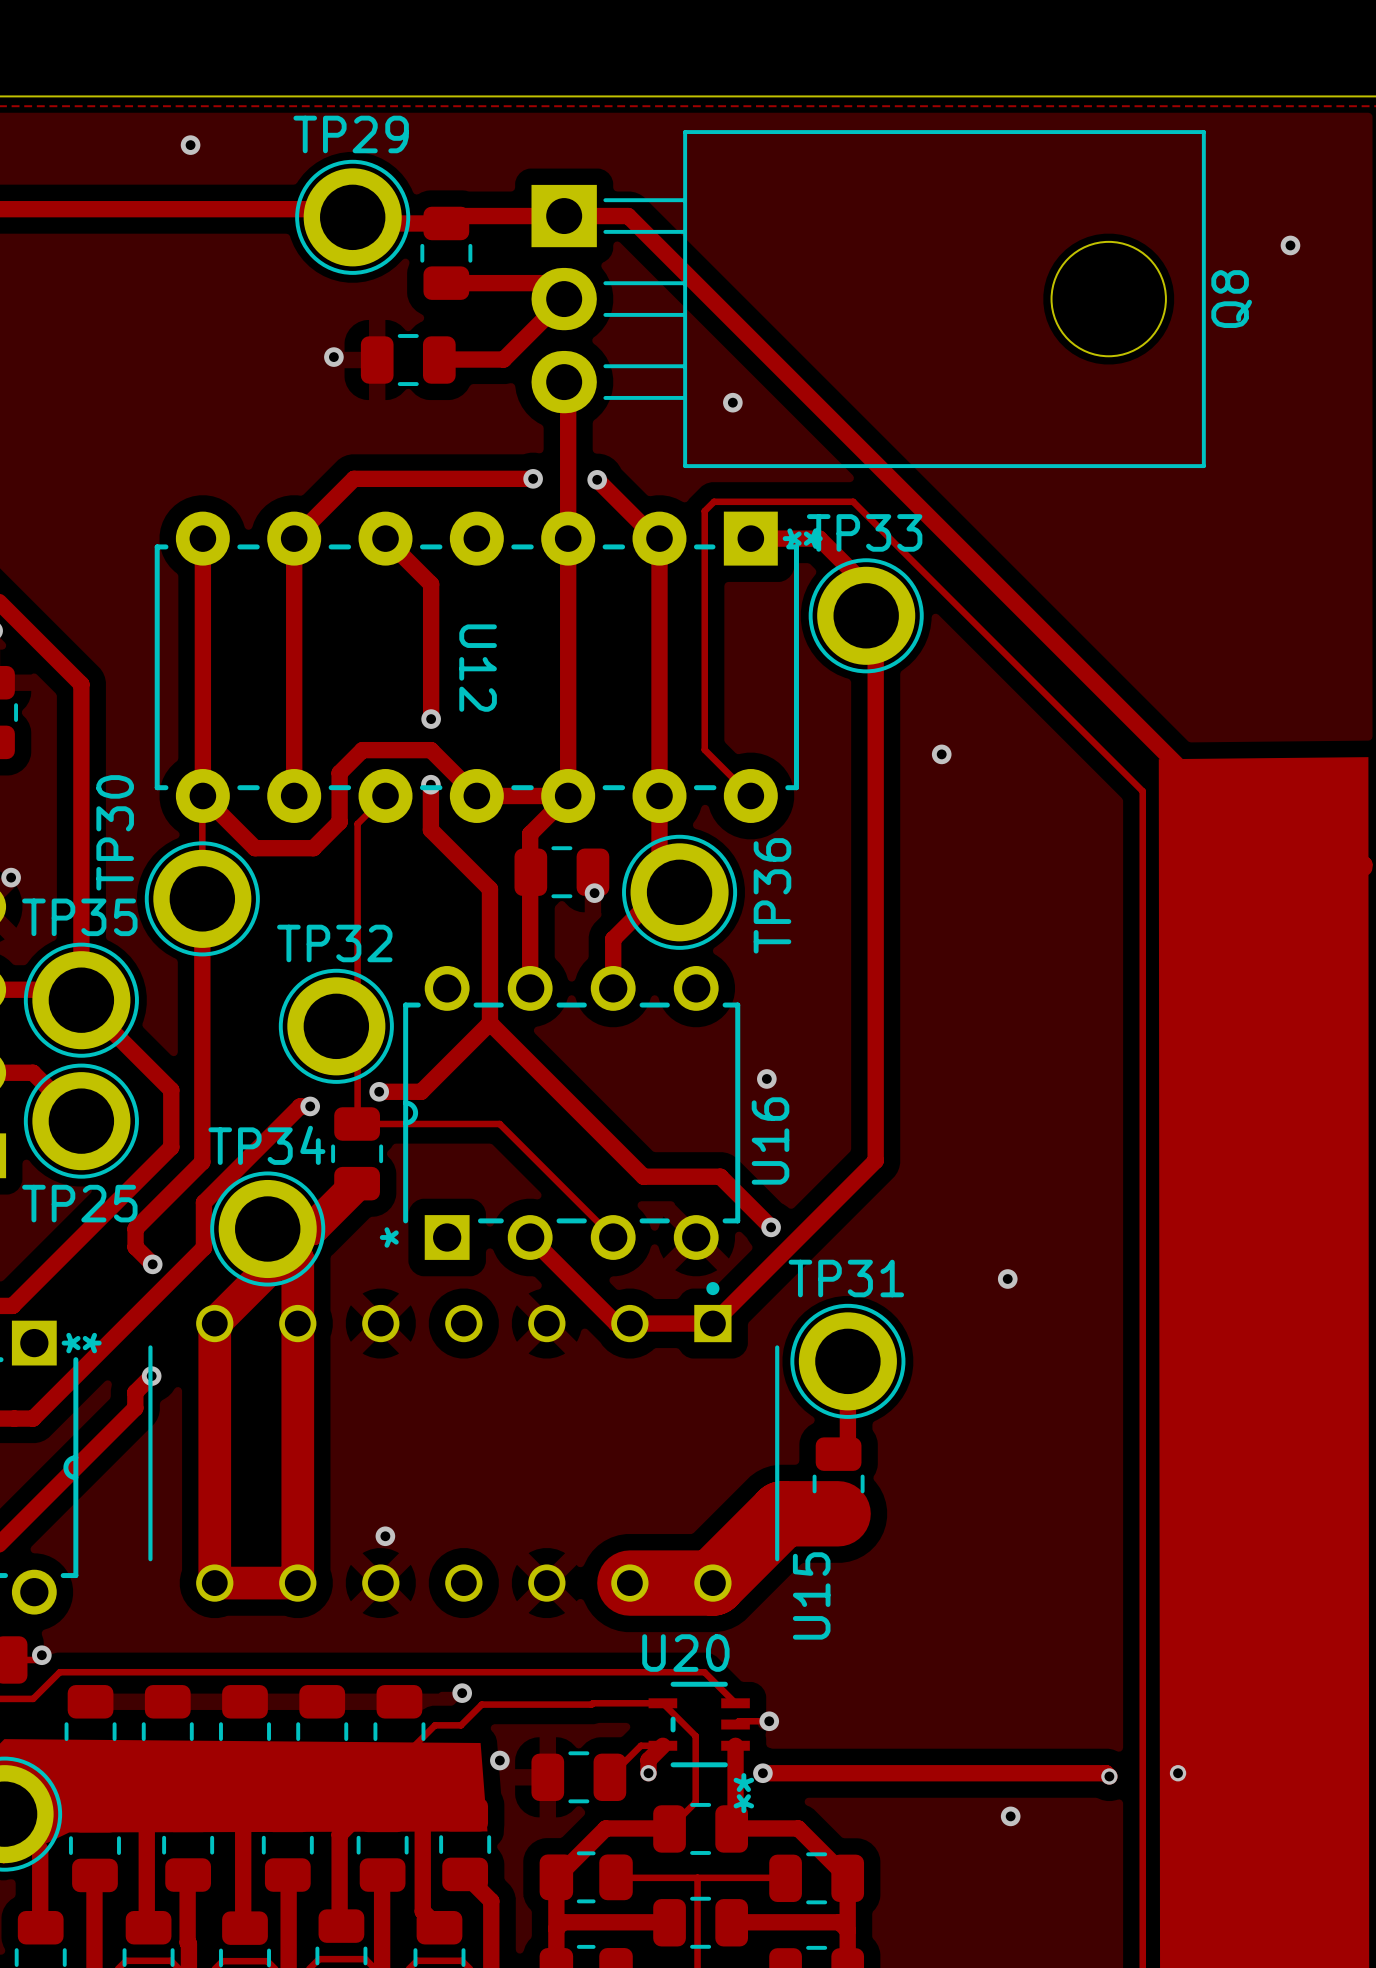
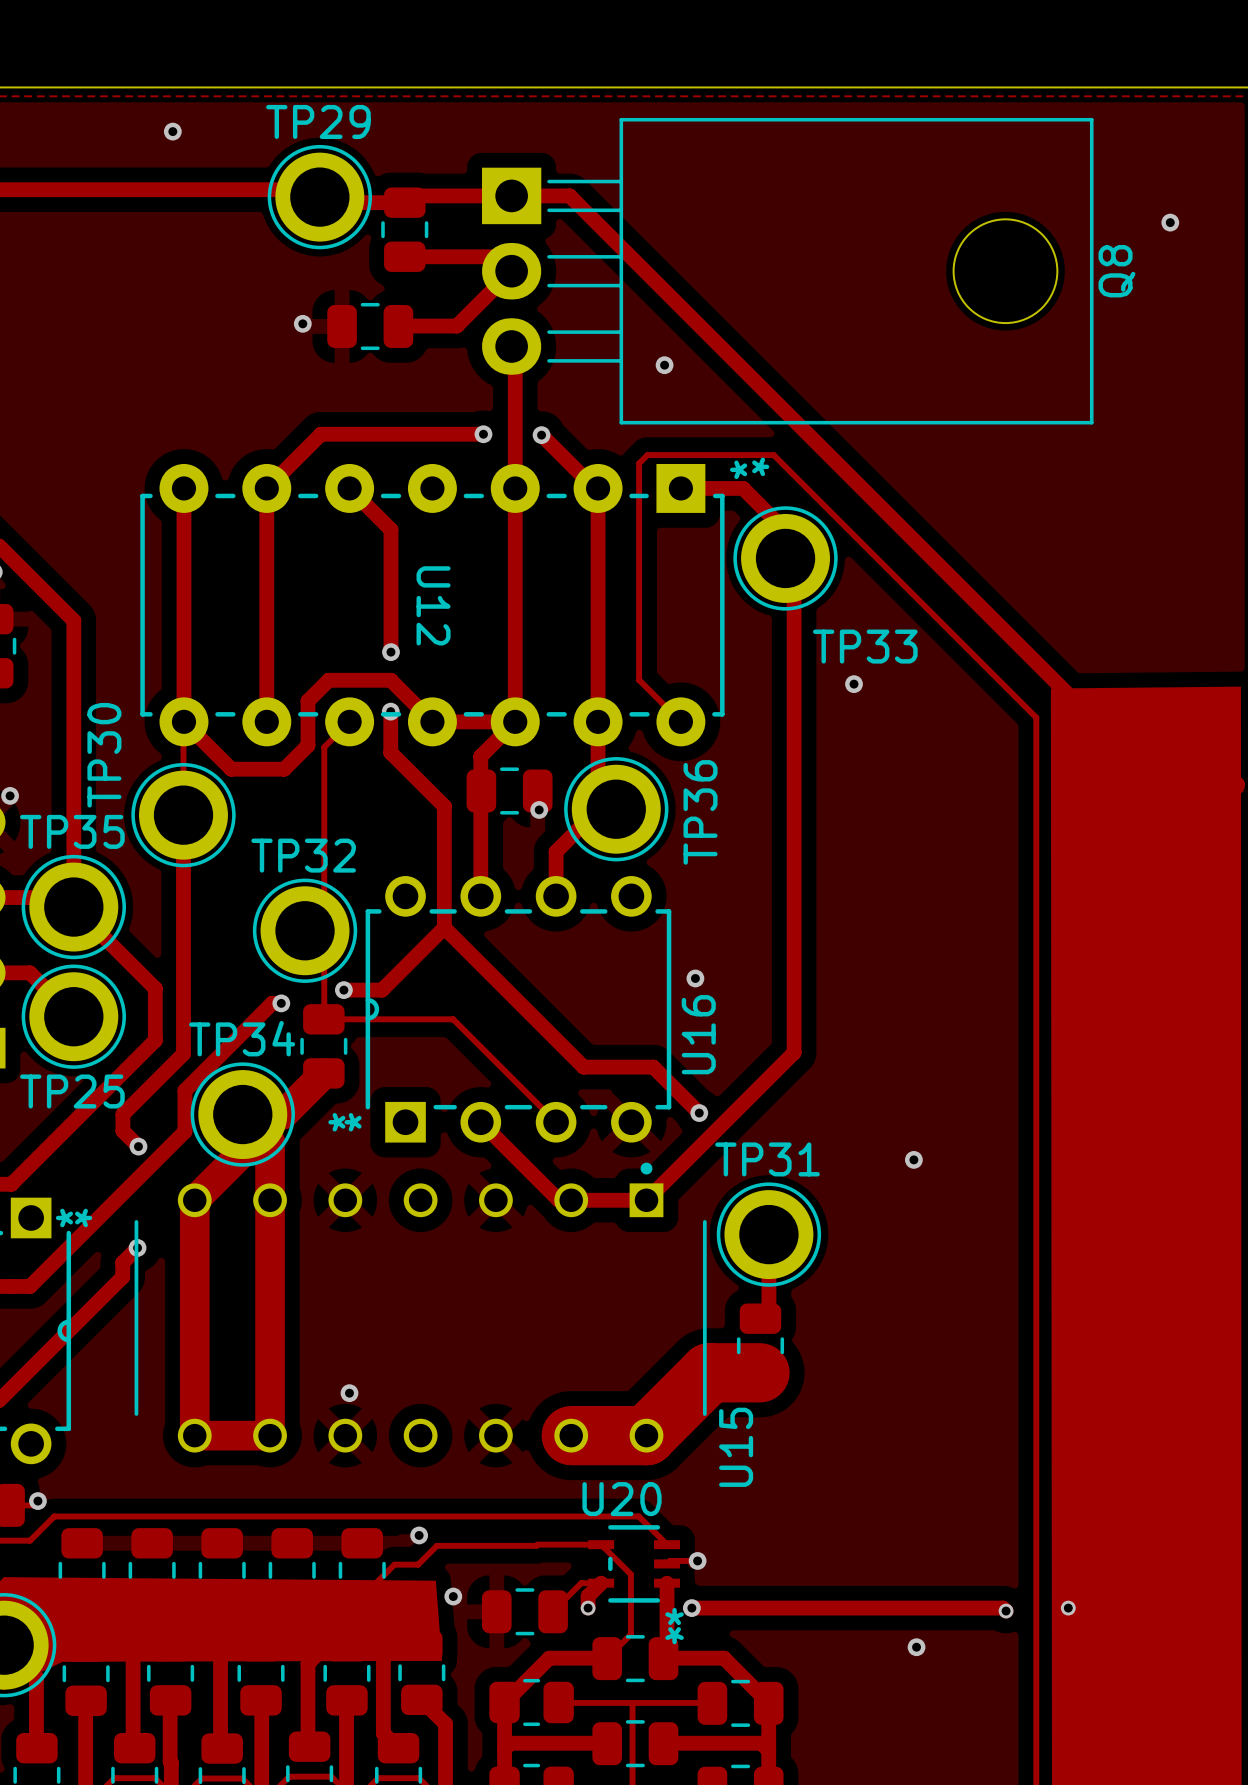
U12 footprint: [154, 511, 799, 823] -> [140, 463, 725, 747]
TP33 name position: TP33 (864, 532) -> TP33 (865, 646)
U16 text: none -> * (336, 1122)

